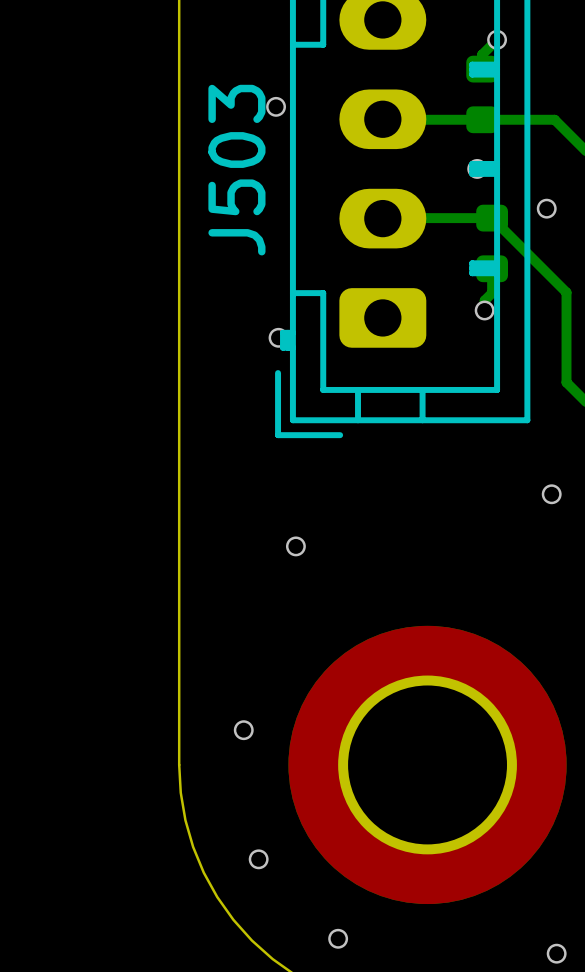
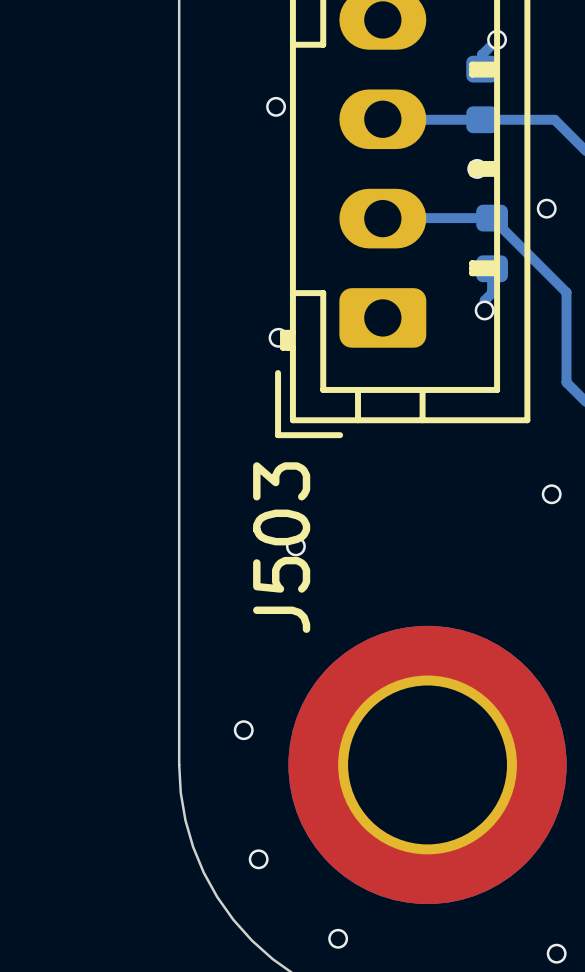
J503 name position: J503 (236, 170) -> J503 (281, 547)

